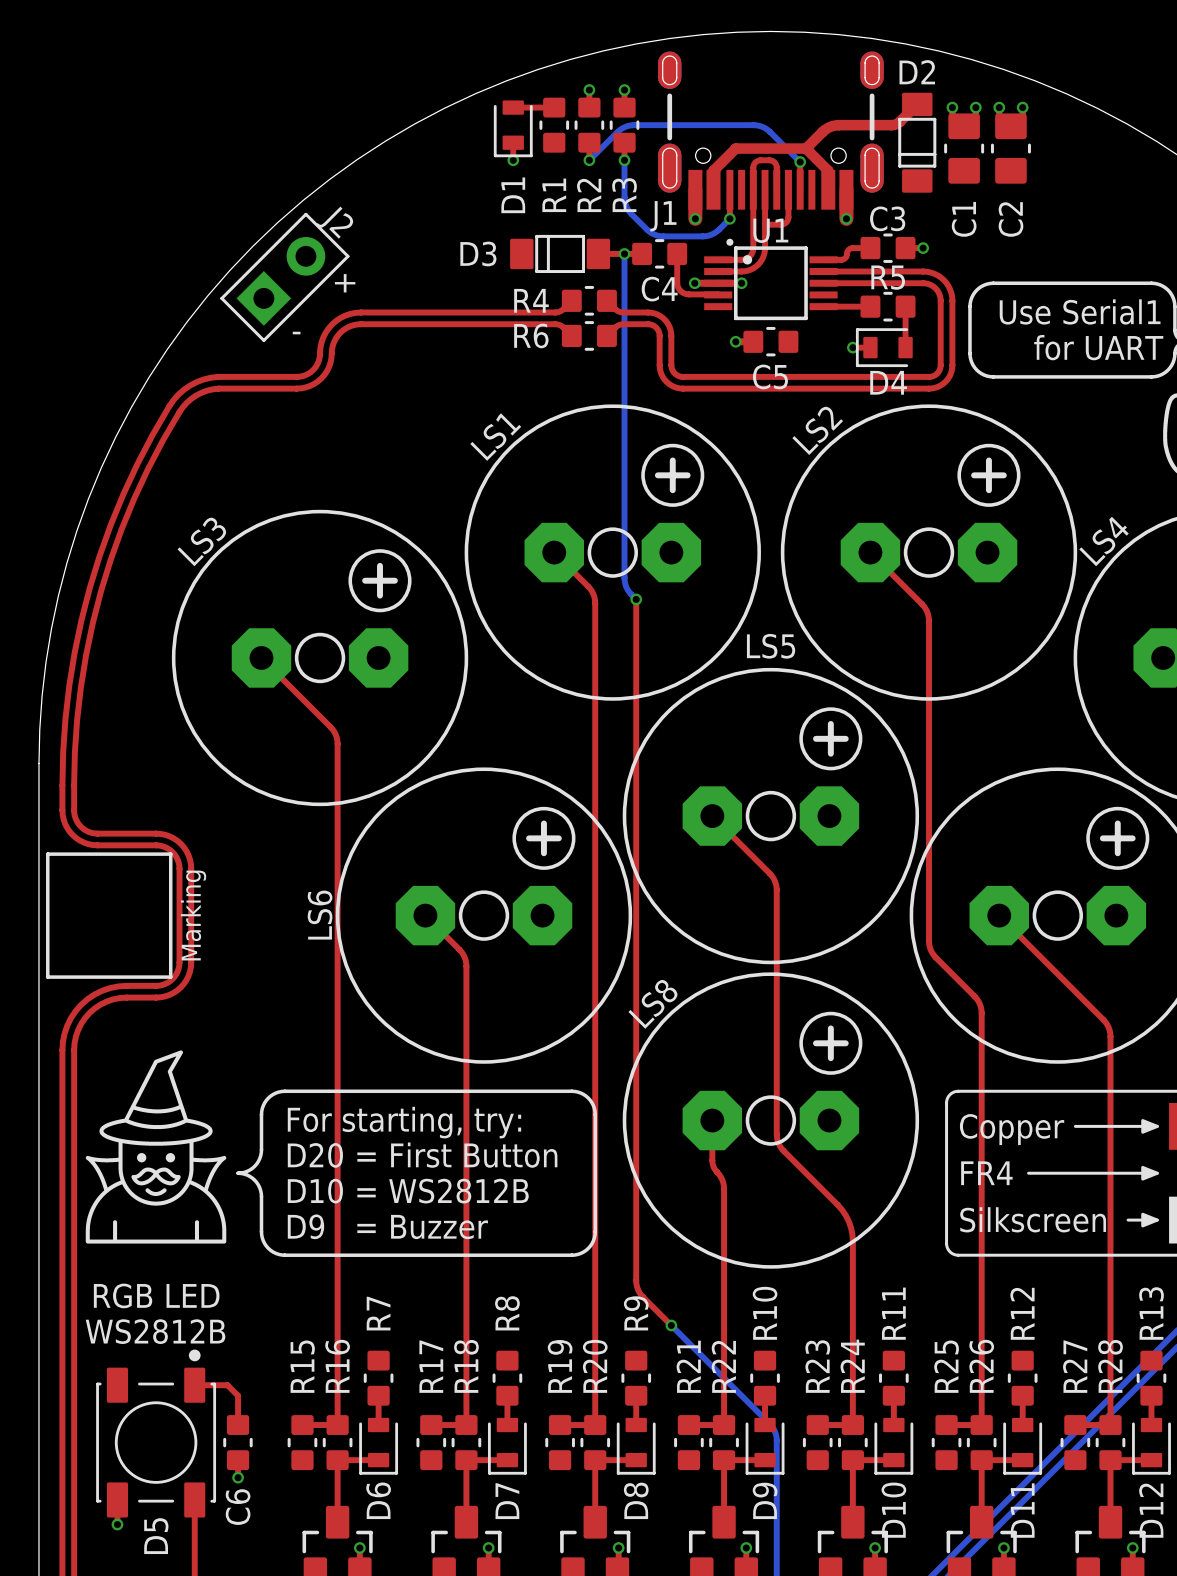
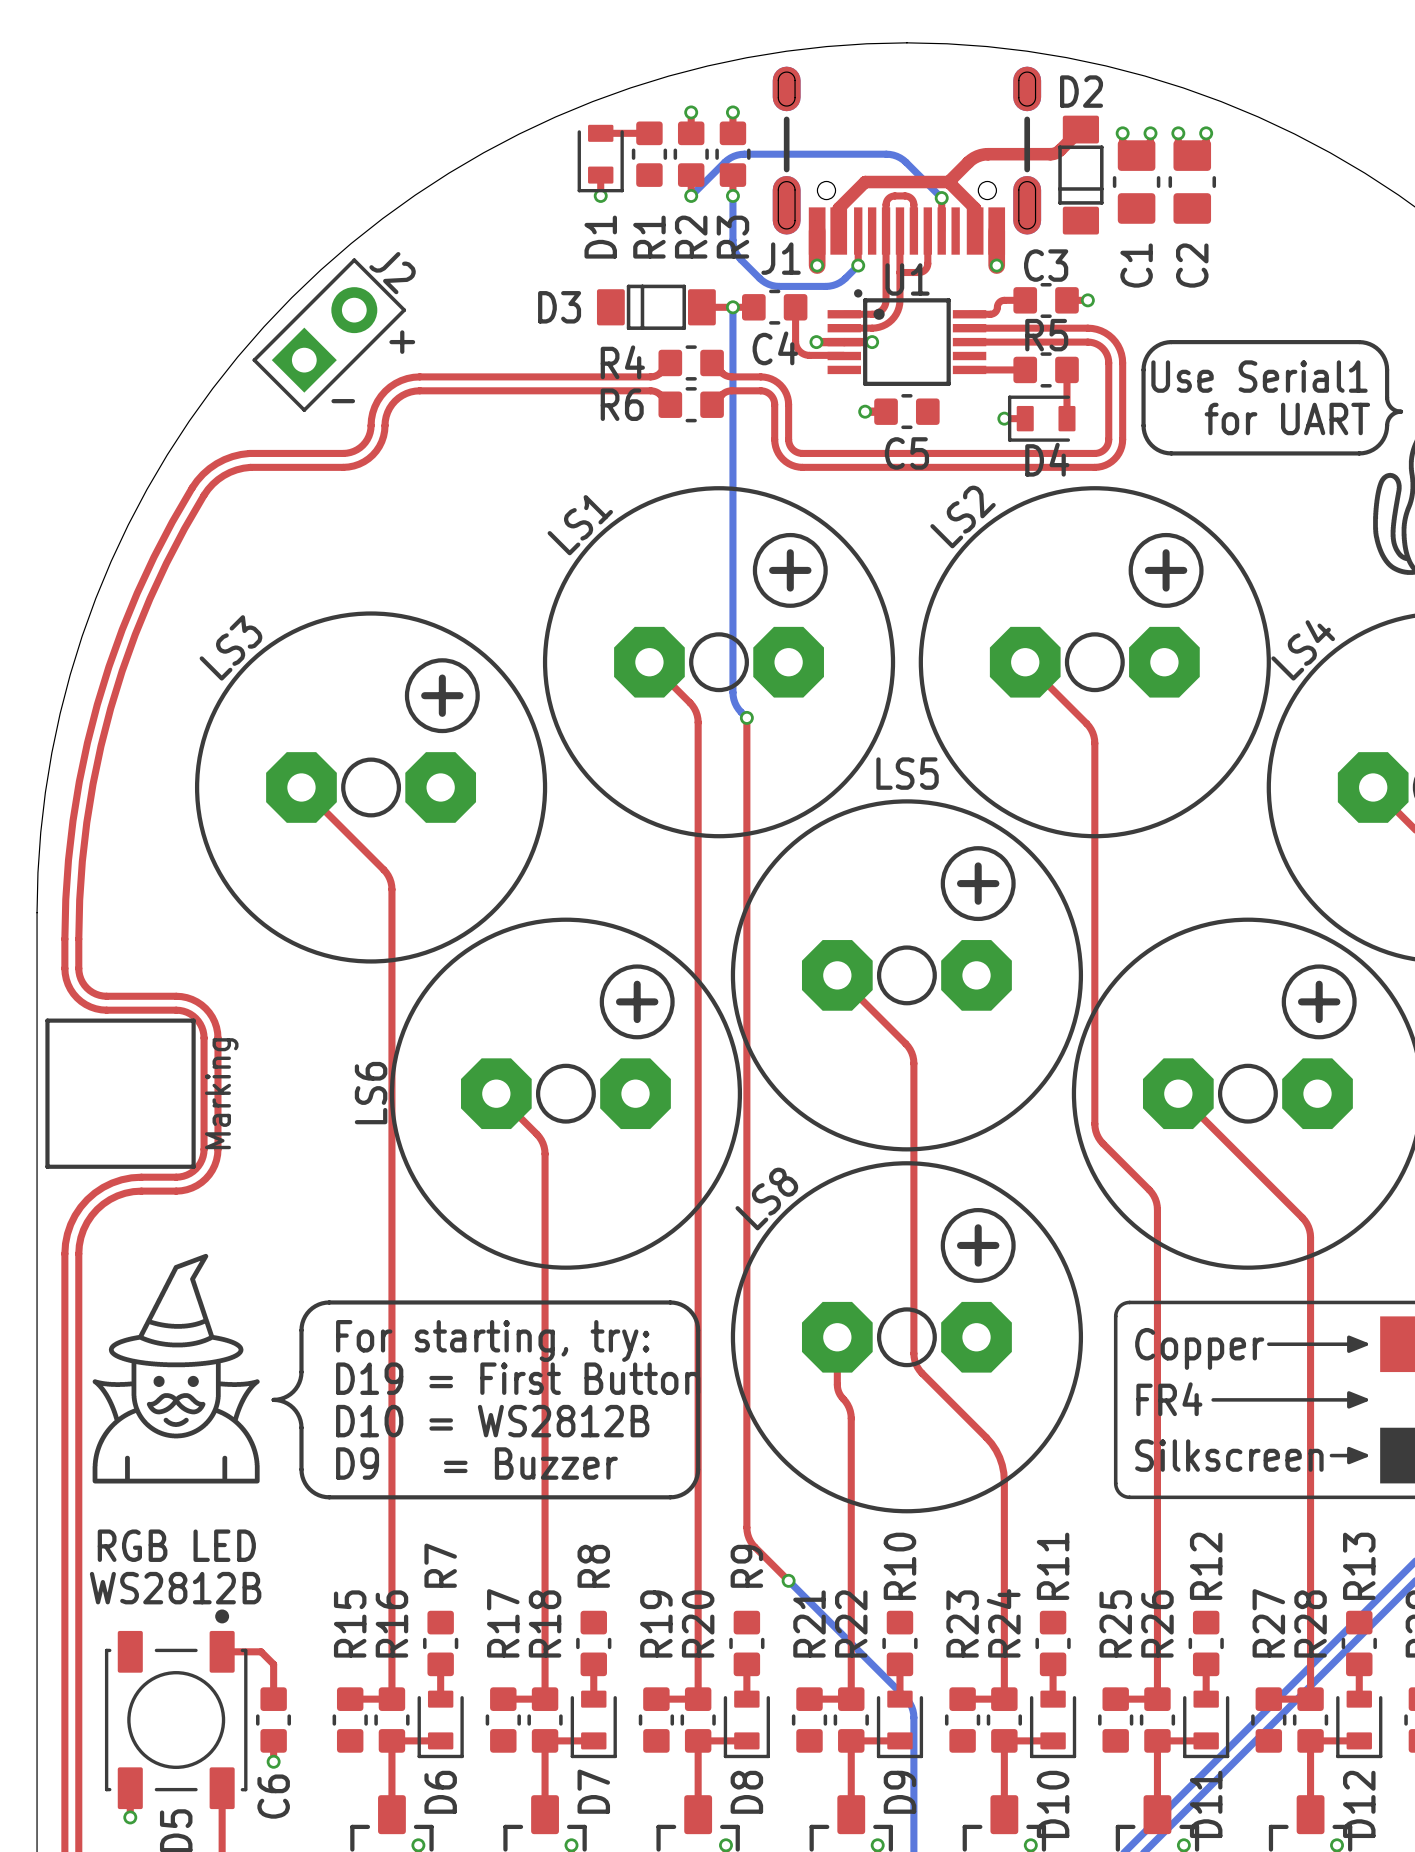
text: D20 = First Button (422, 1155) -> D19 = First Button (518, 1378)

